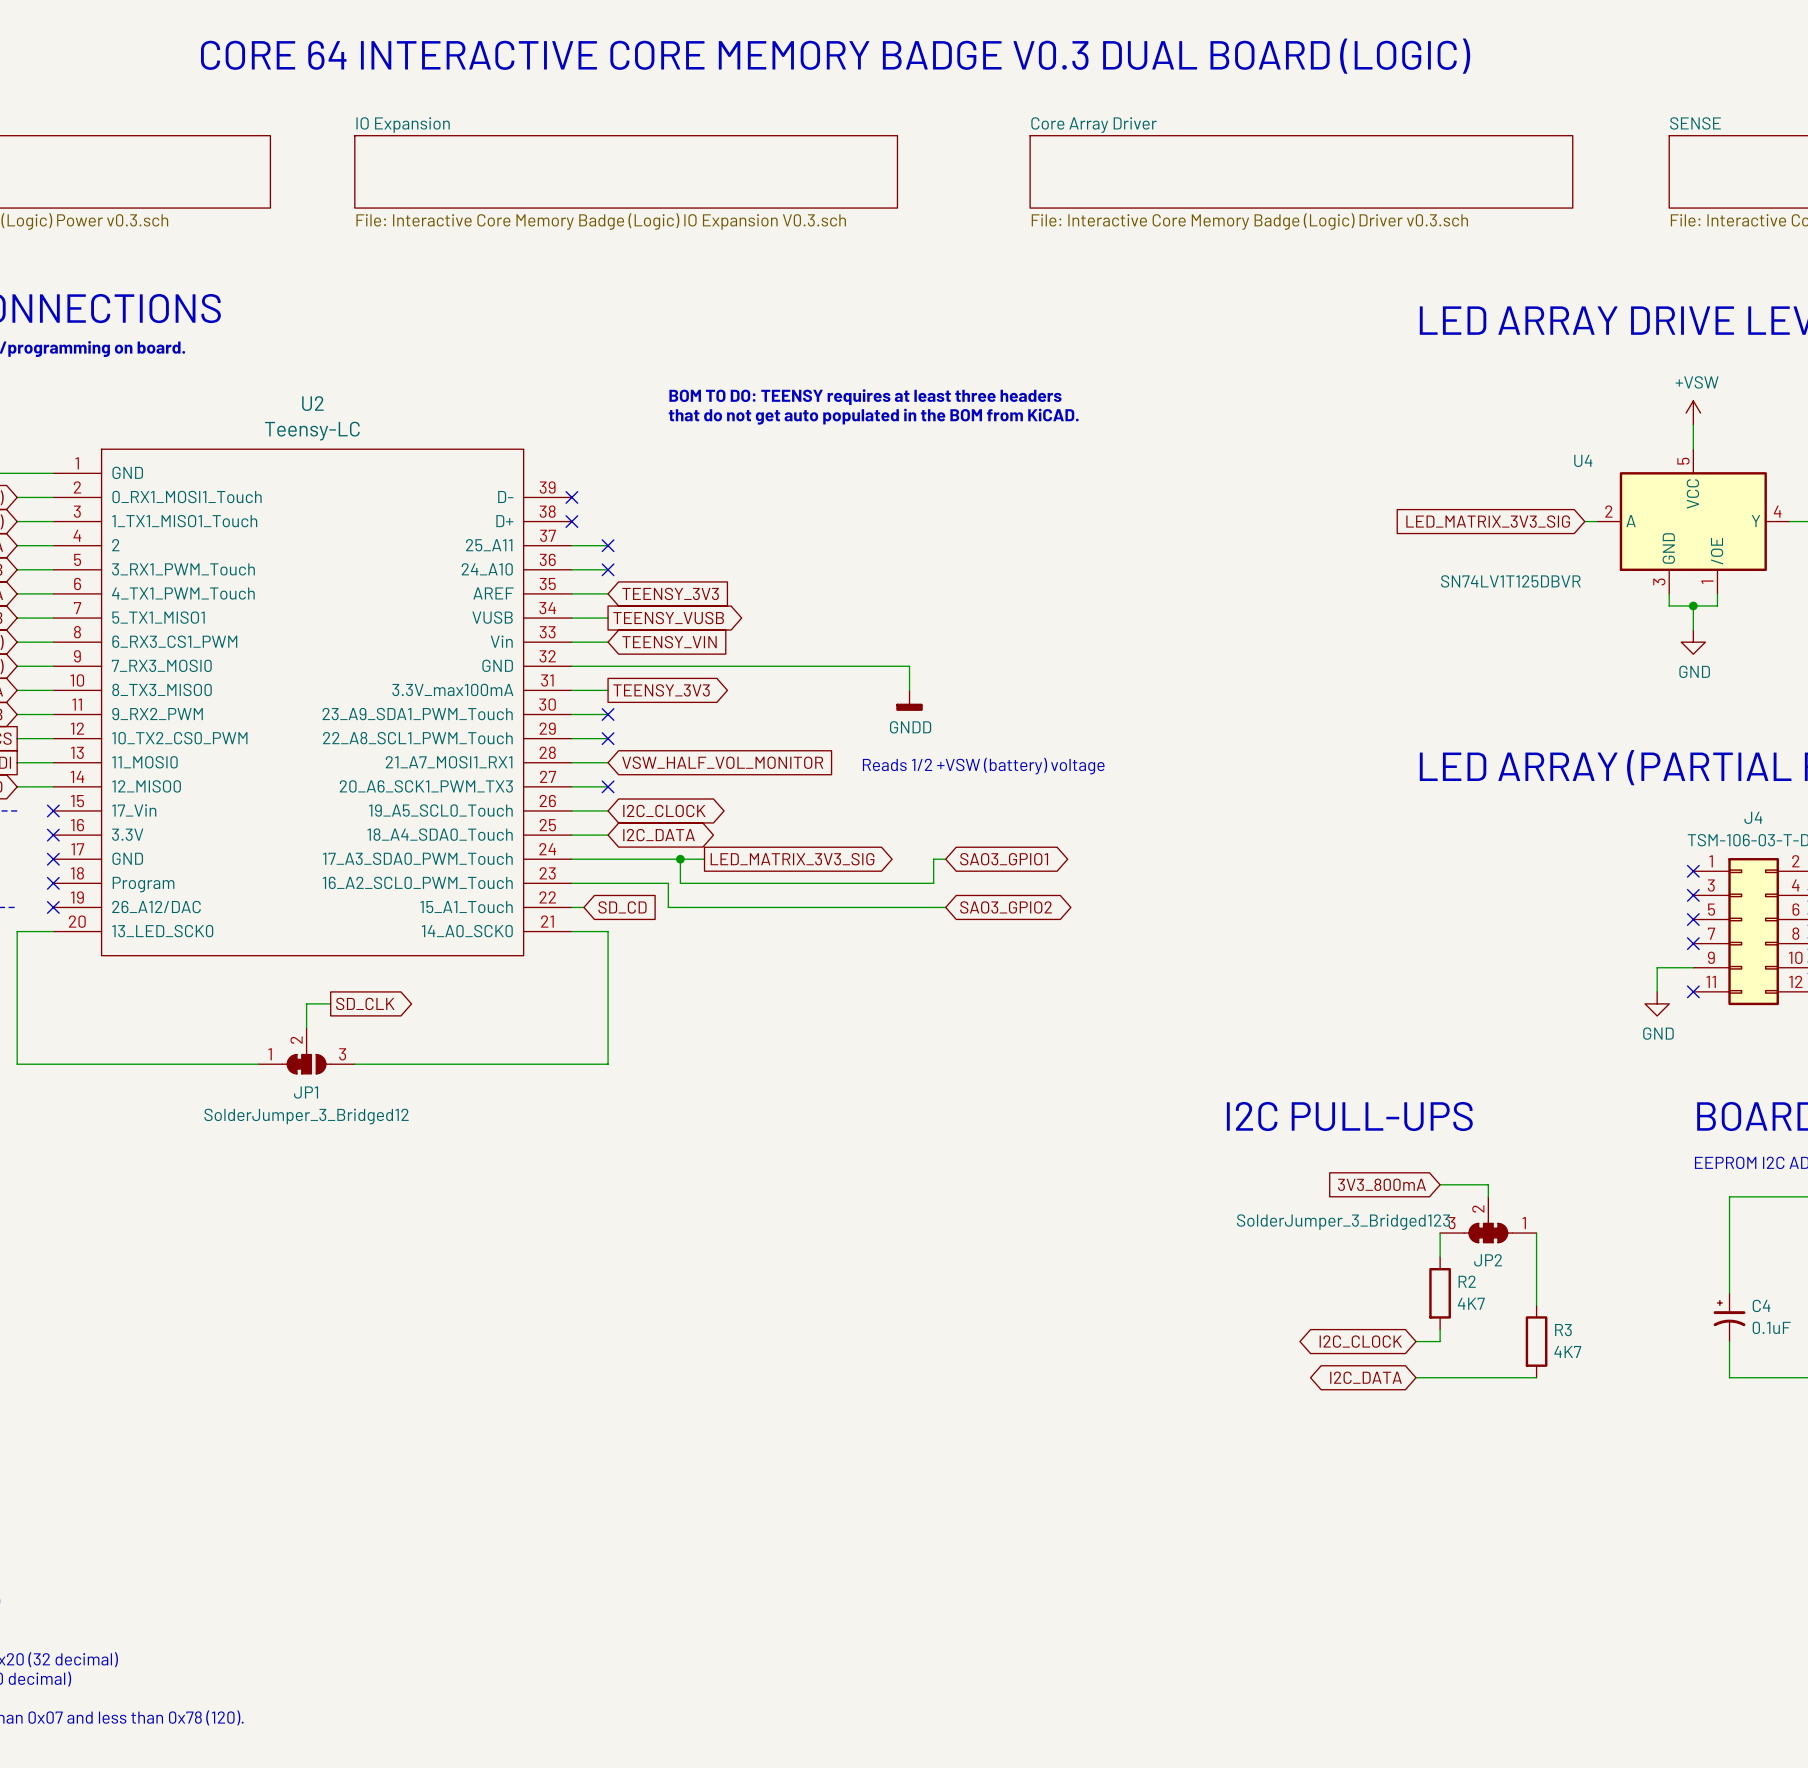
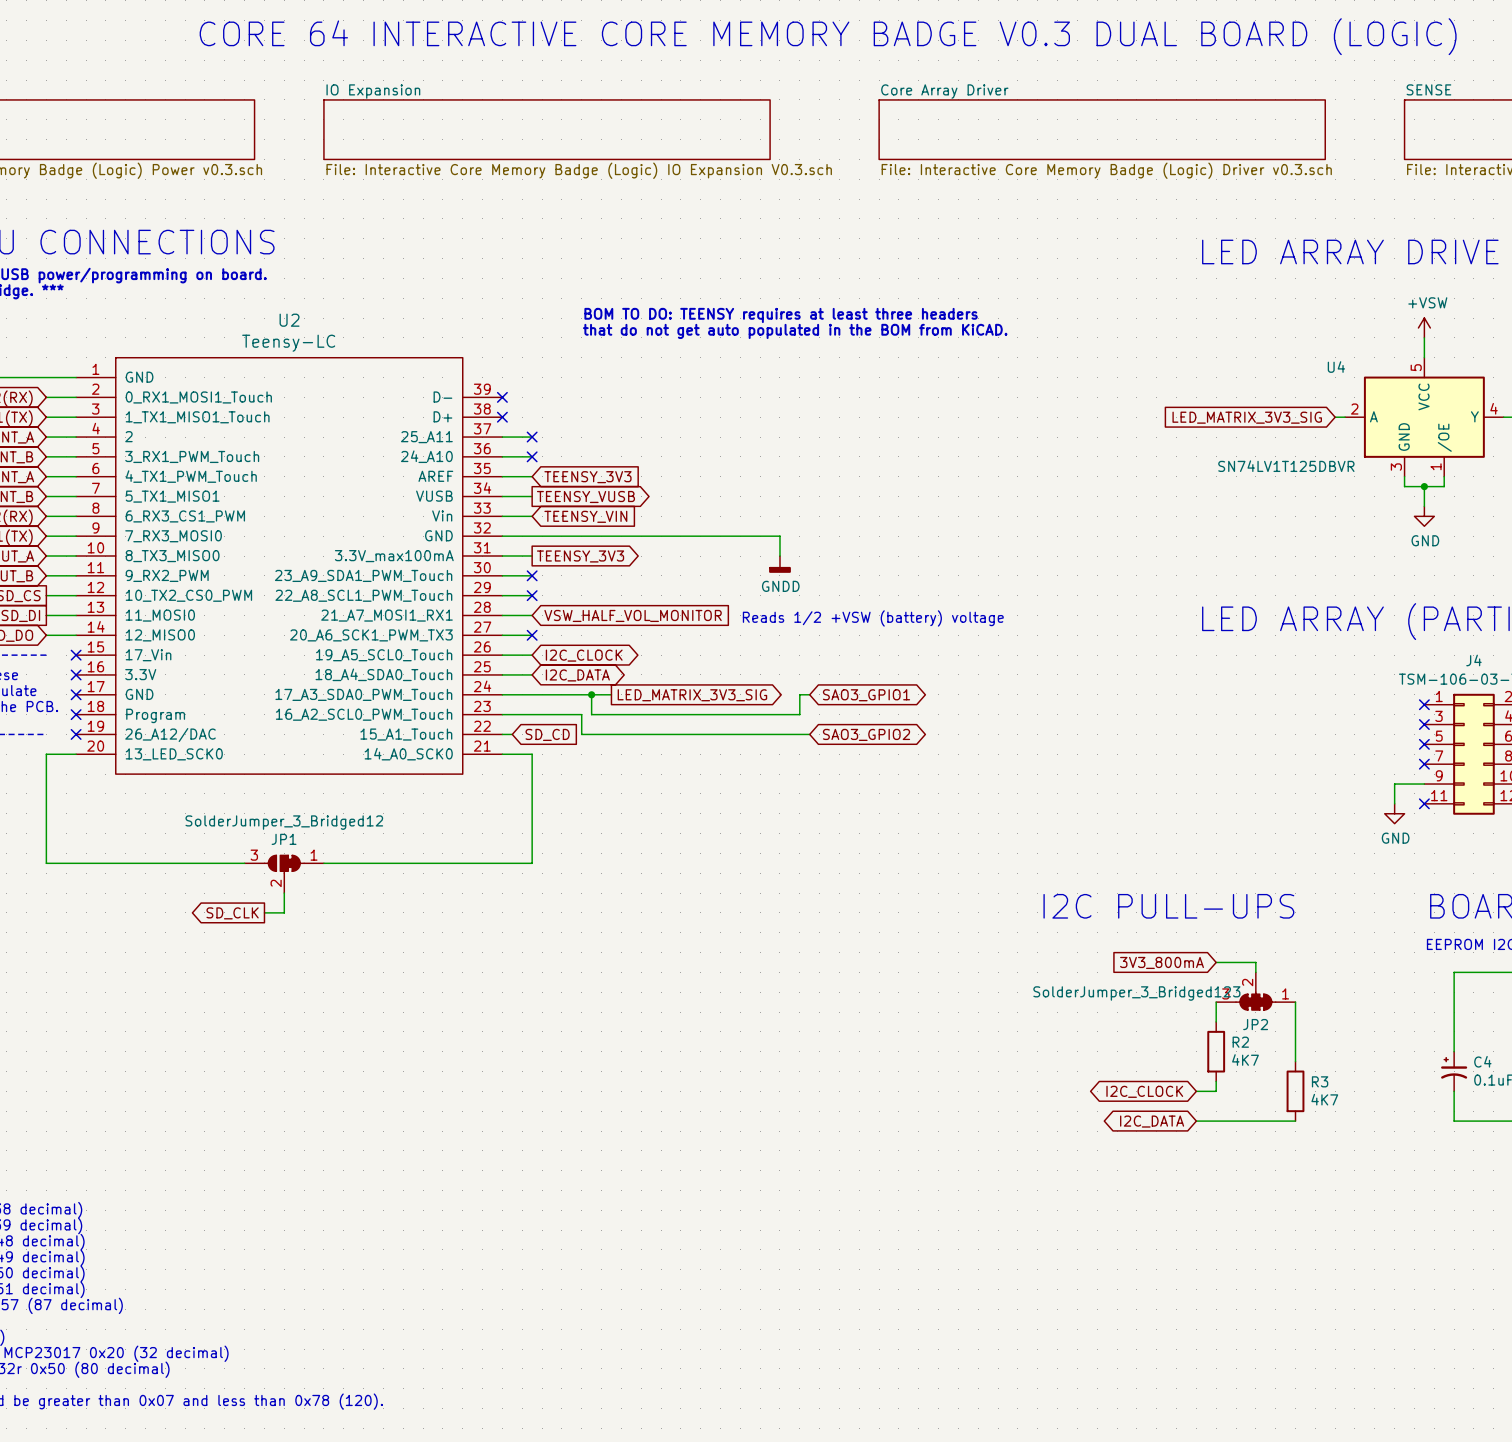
wire: (330, 1003) (306, 1003) (306, 1028) -> none
global label rotation: 0° (365, 1003) -> 180° (232, 913)
global label position: SD_CLK (365, 1003) -> SD_CLK (232, 913)
JP1 rotation: 0° (306, 1063) -> 180° (284, 864)
wire: none -> (284, 893) (284, 912) (264, 912)

